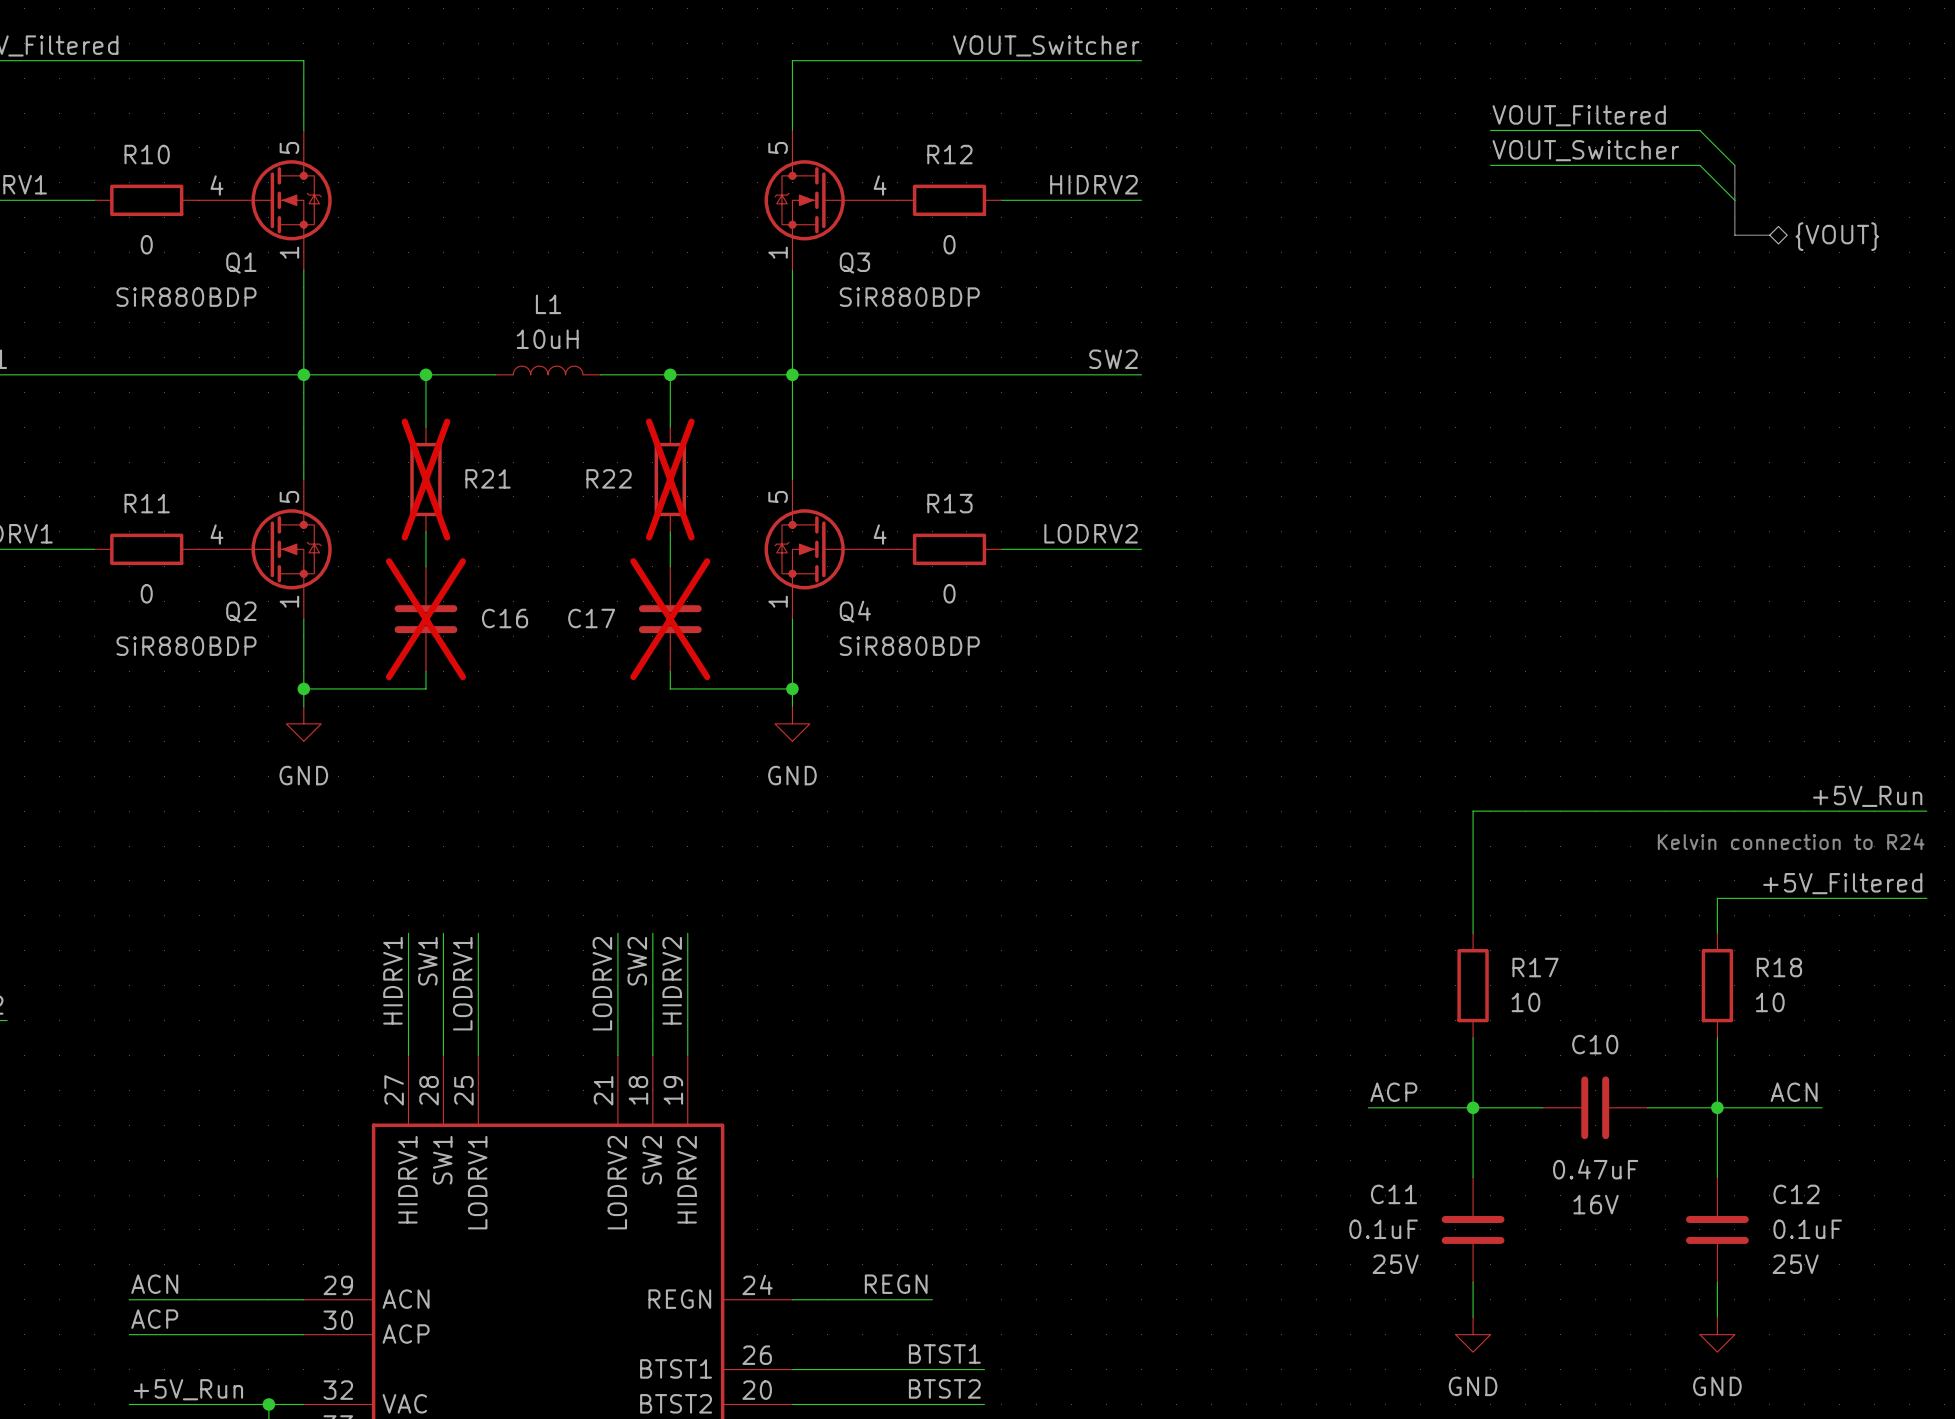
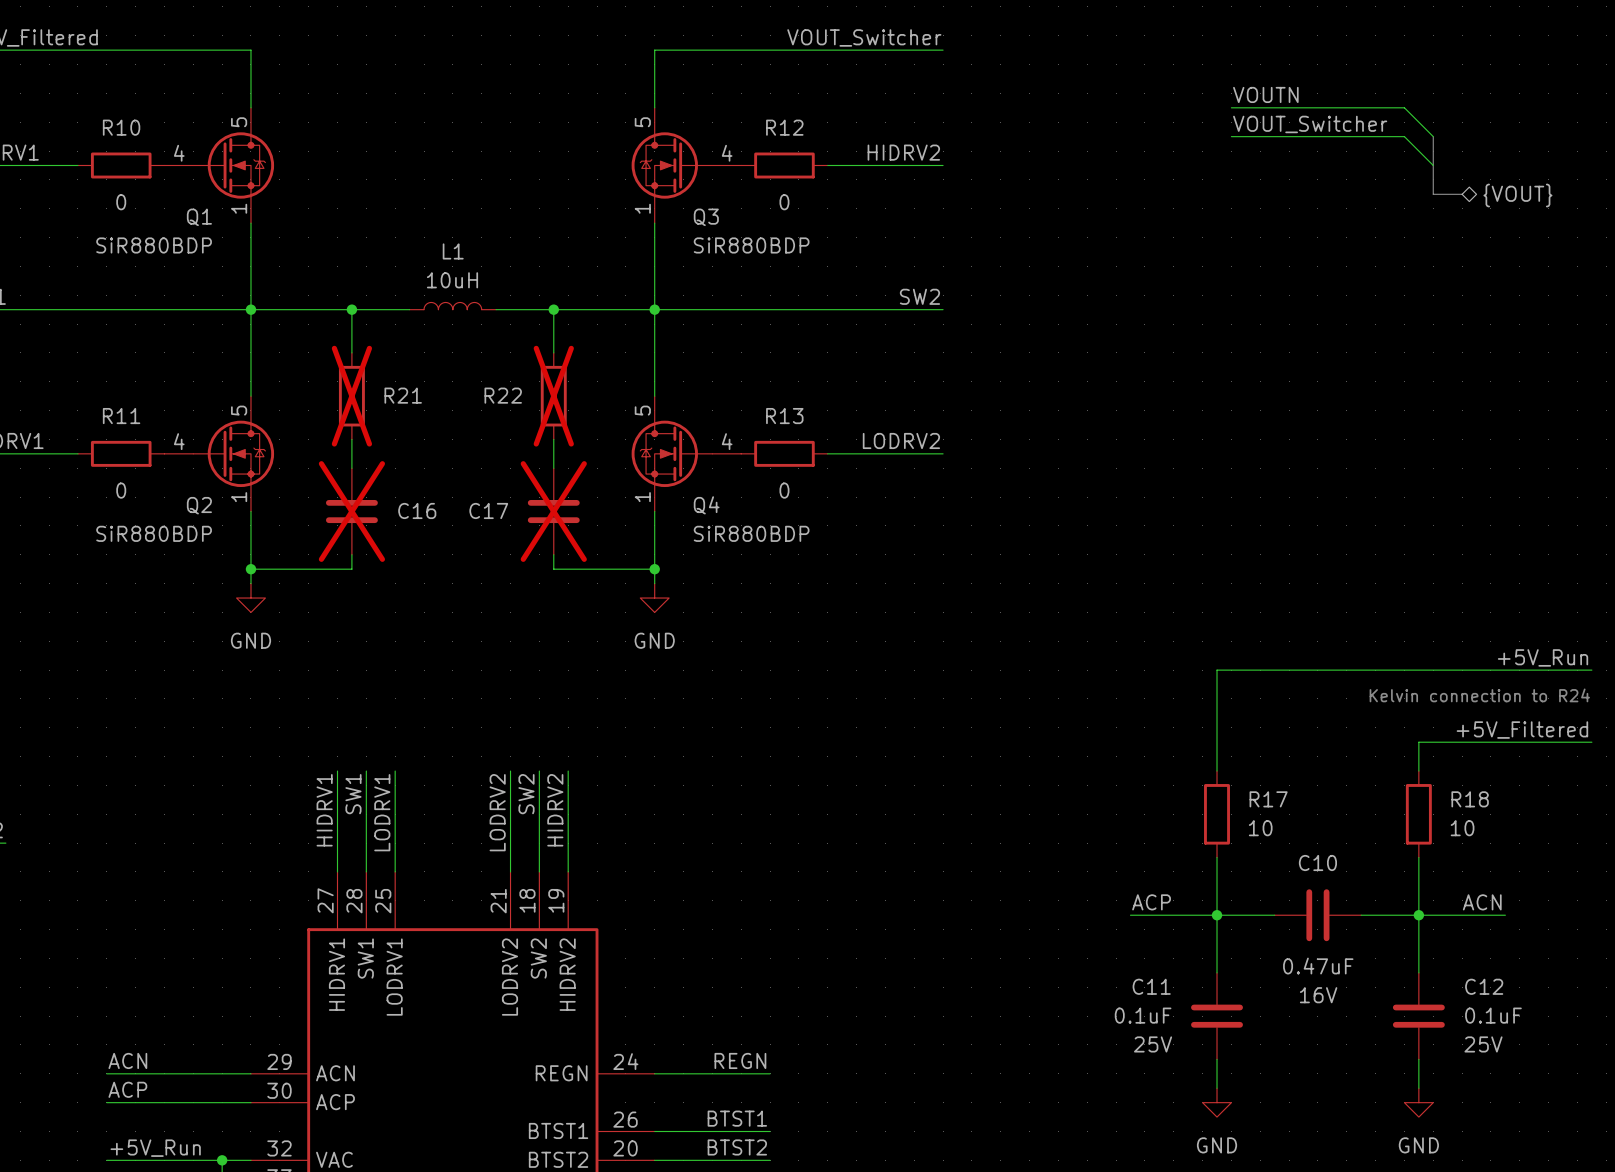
label: VOUT_Filtered (1579, 115) -> VOUTN (1265, 94)
label position: BTST1 (944, 1354) -> BTST1 (737, 1118)
wire: (932, 1369) (984, 1369) -> none
label position: BTST2 (944, 1388) -> BTST2 (737, 1147)
wire: (932, 1404) (984, 1404) -> none

